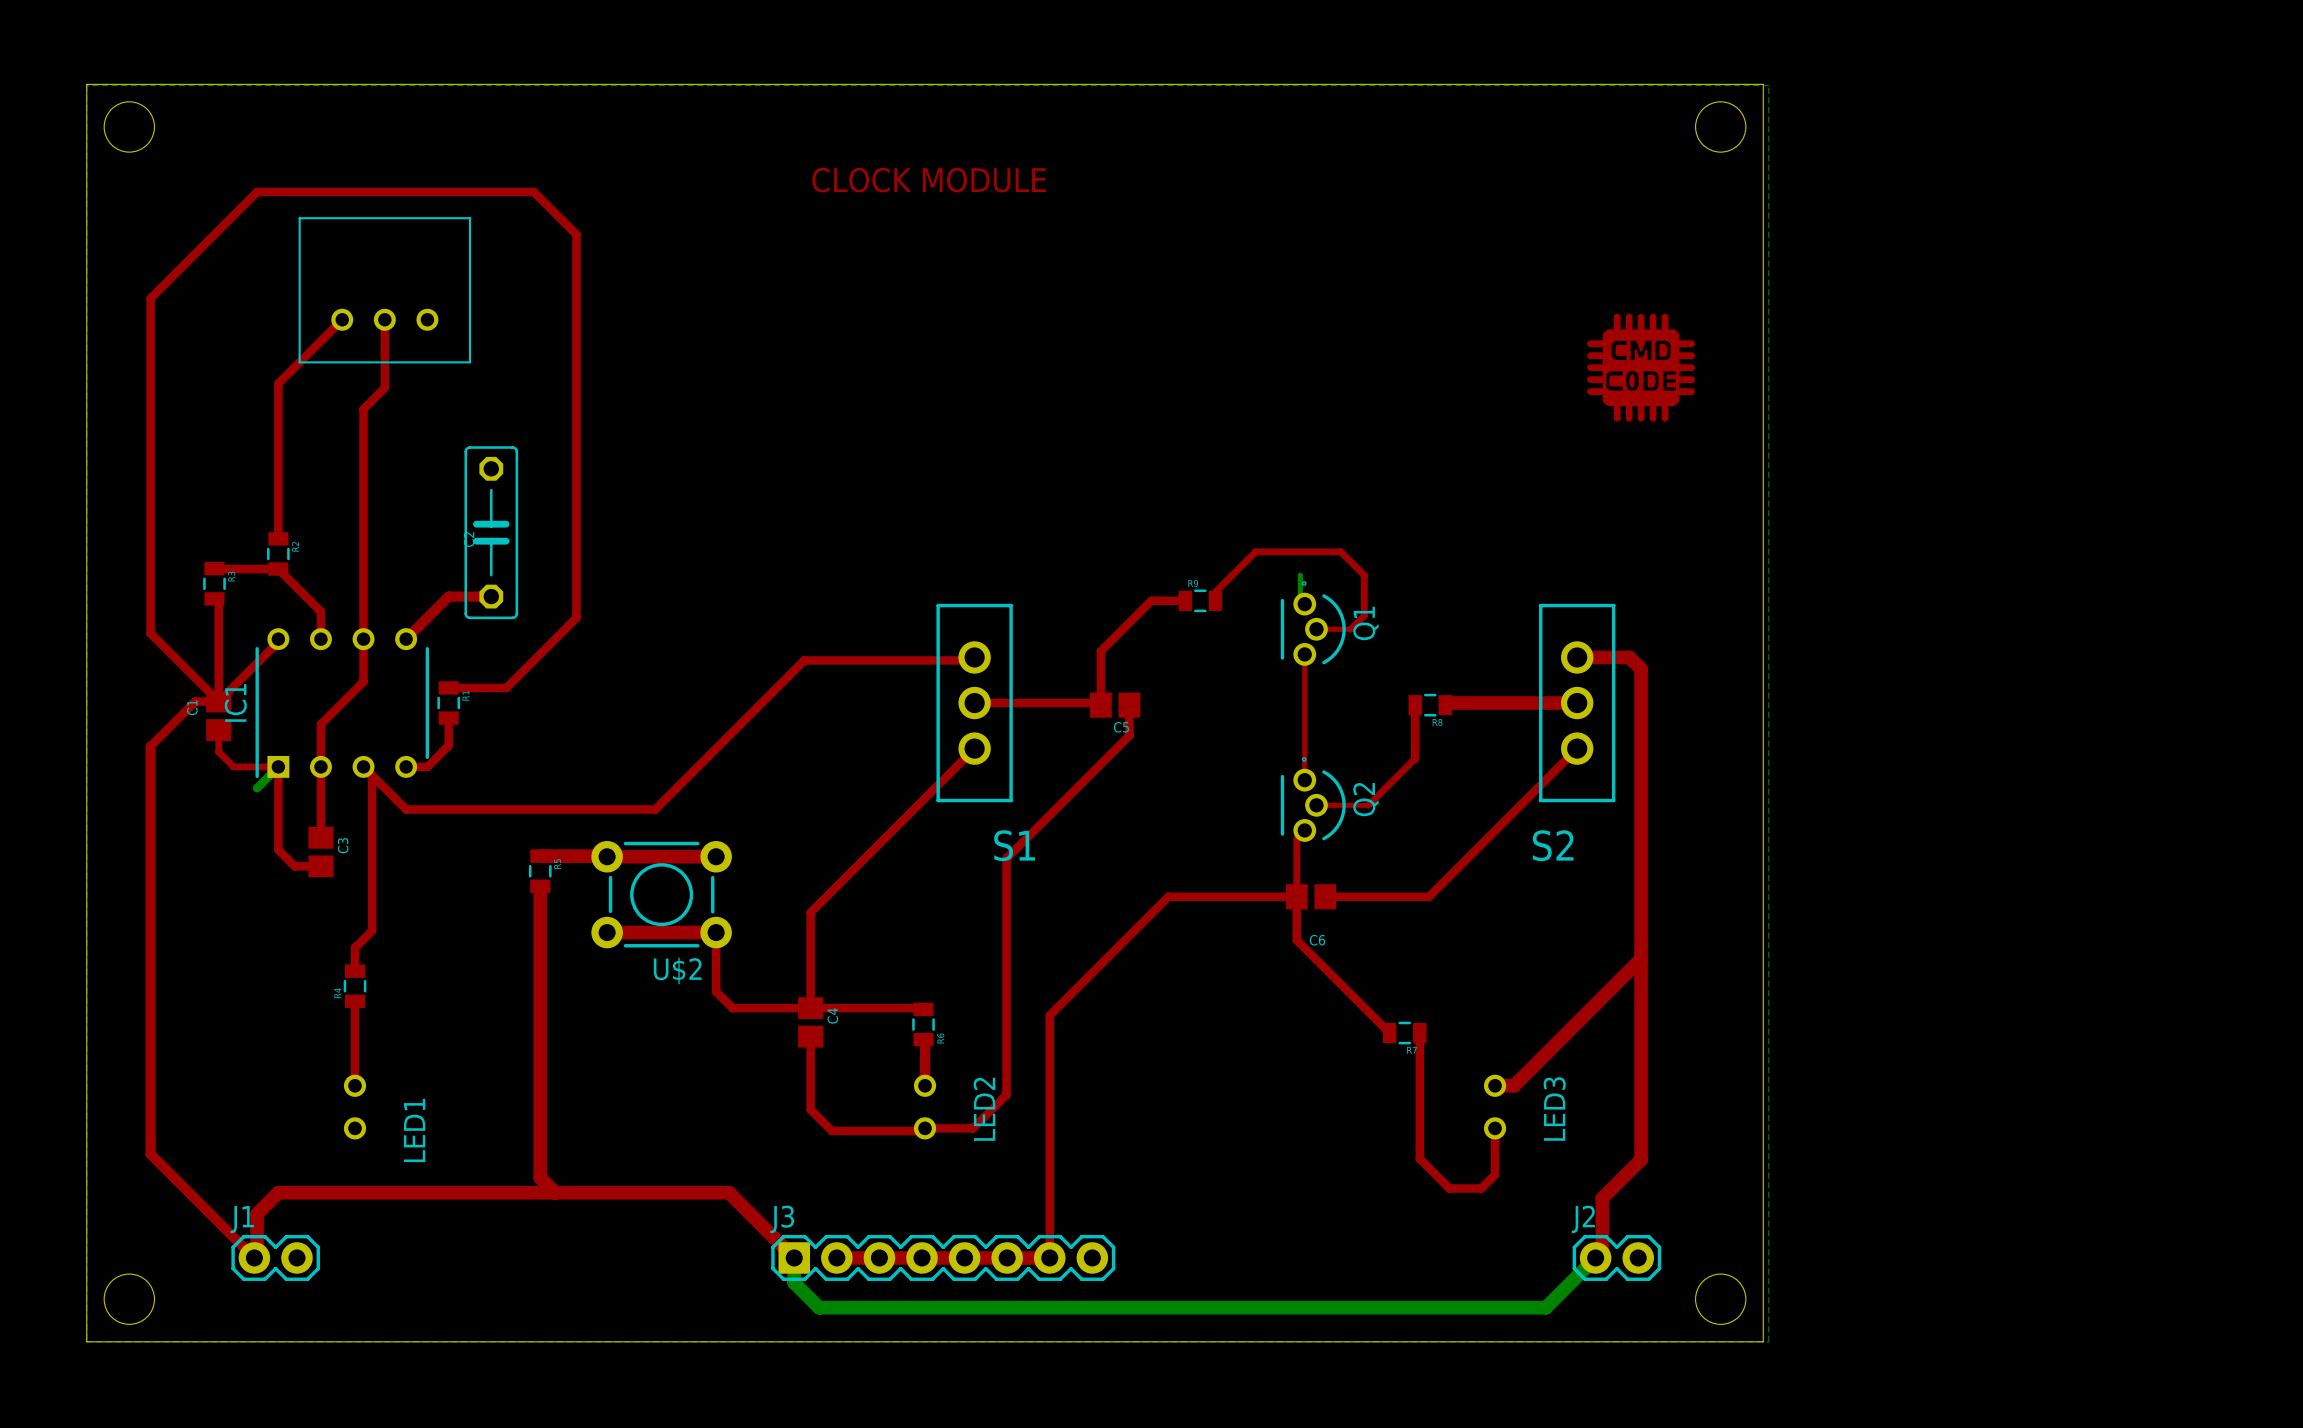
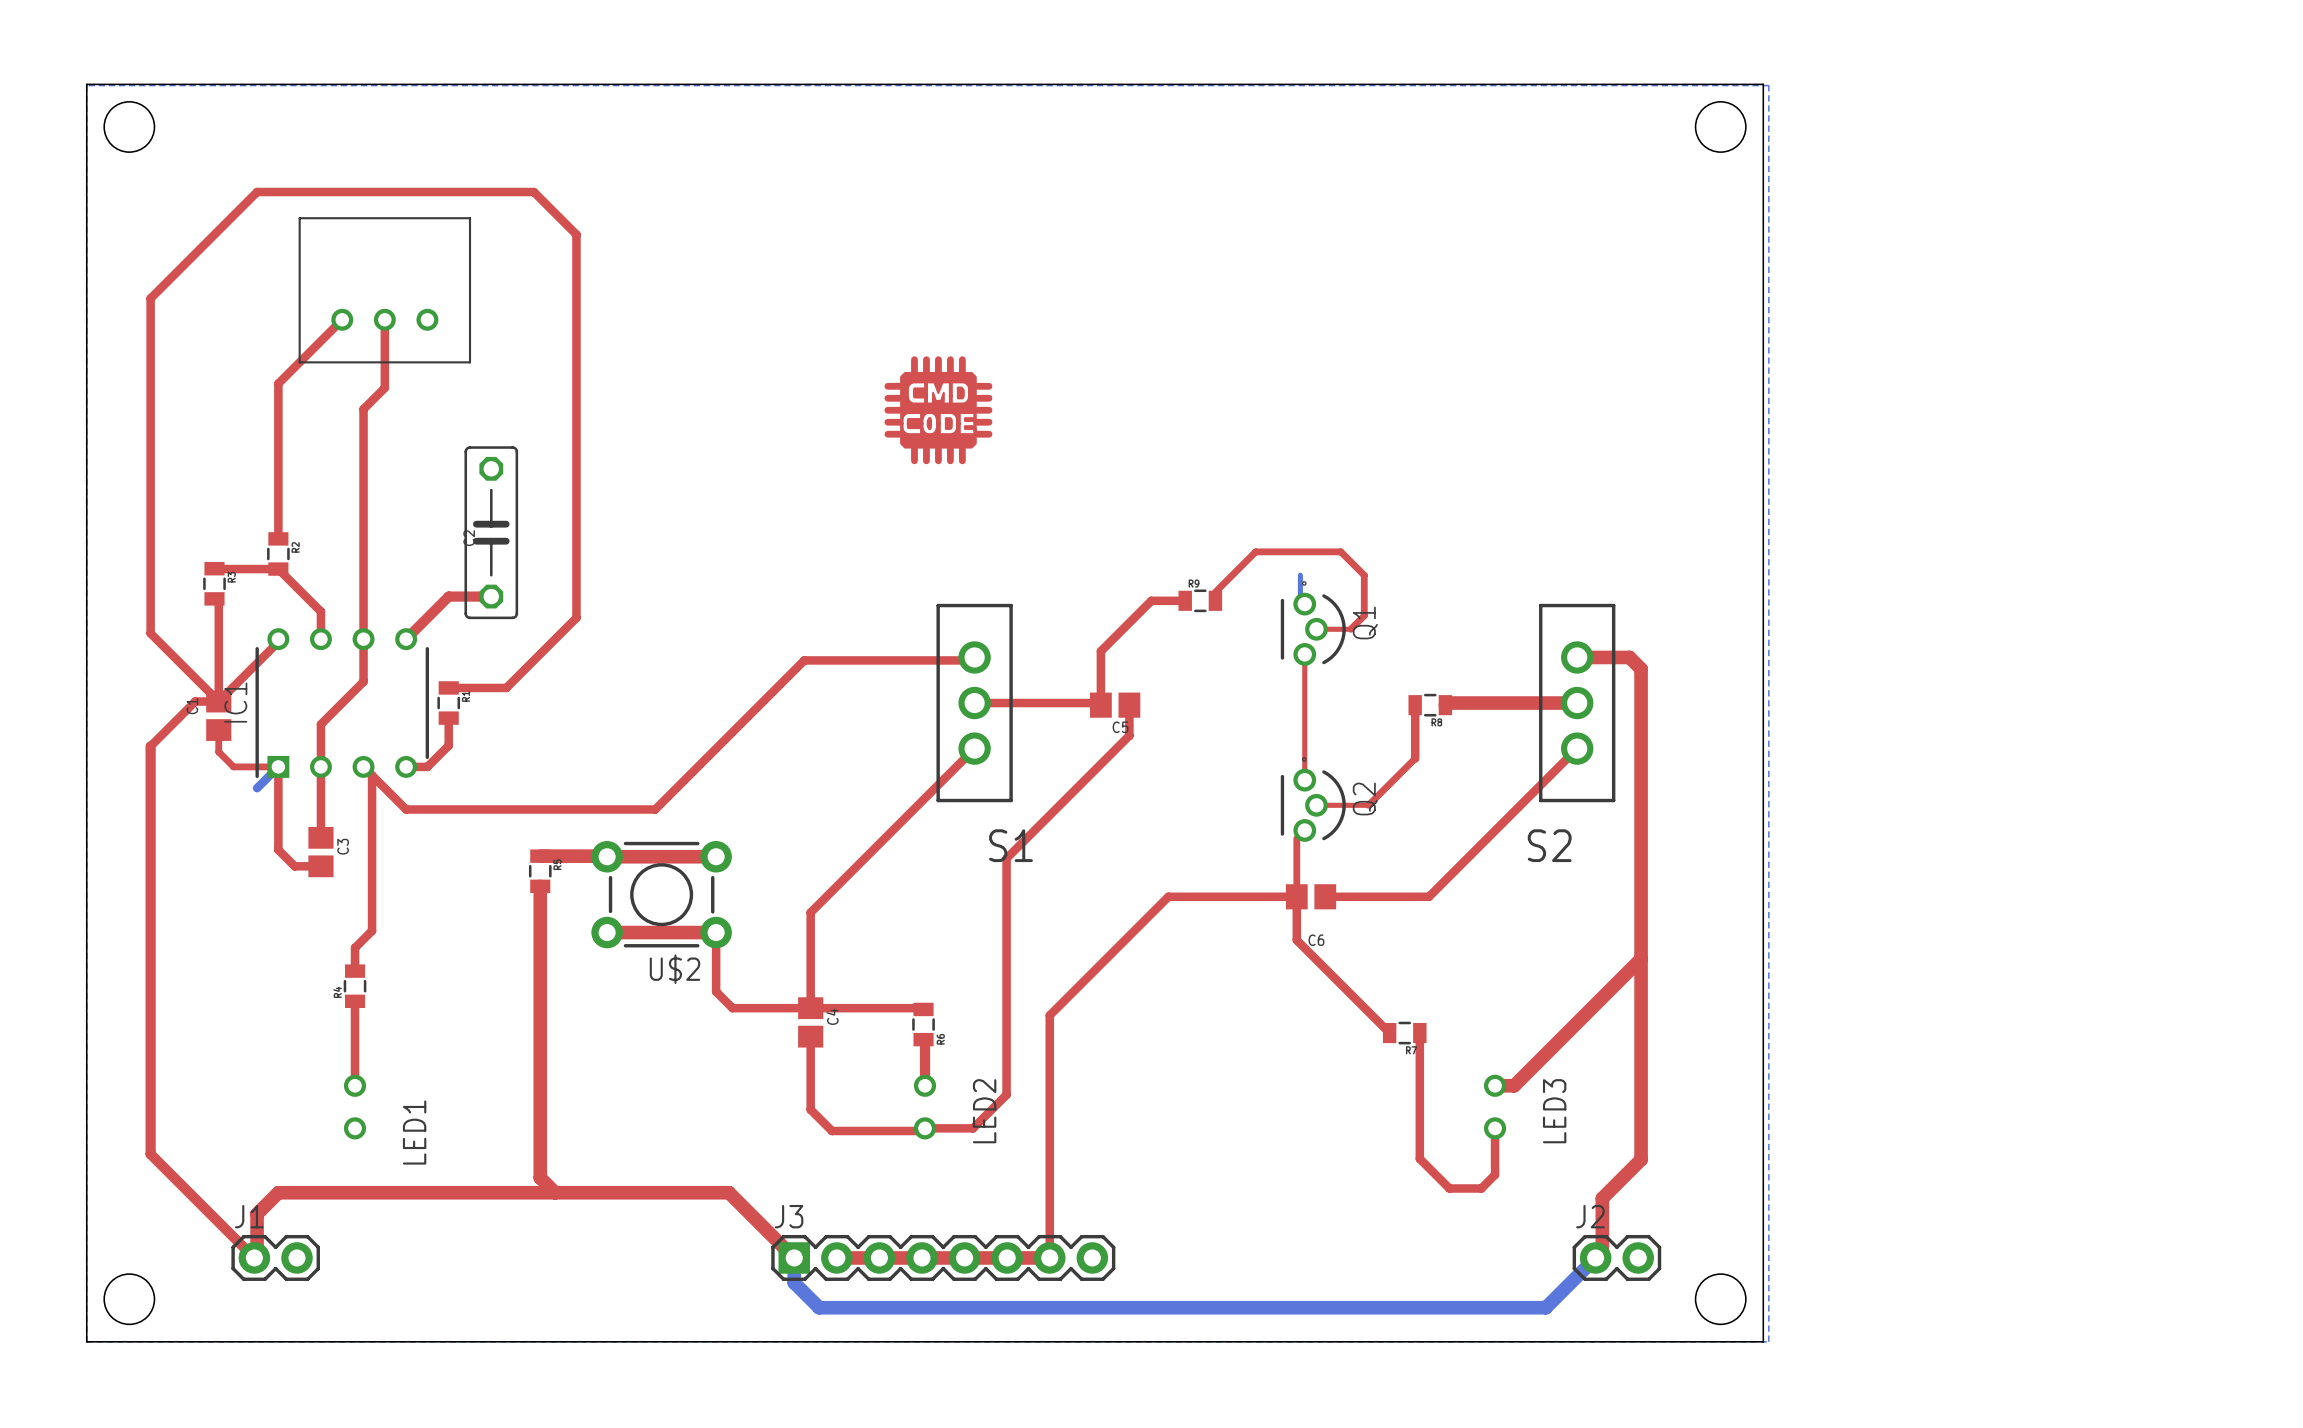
text: CLOCK MODULE (929, 180) -> none
drawing: [1587, 313, 1696, 422] -> none
drawing: none -> [884, 356, 993, 465]

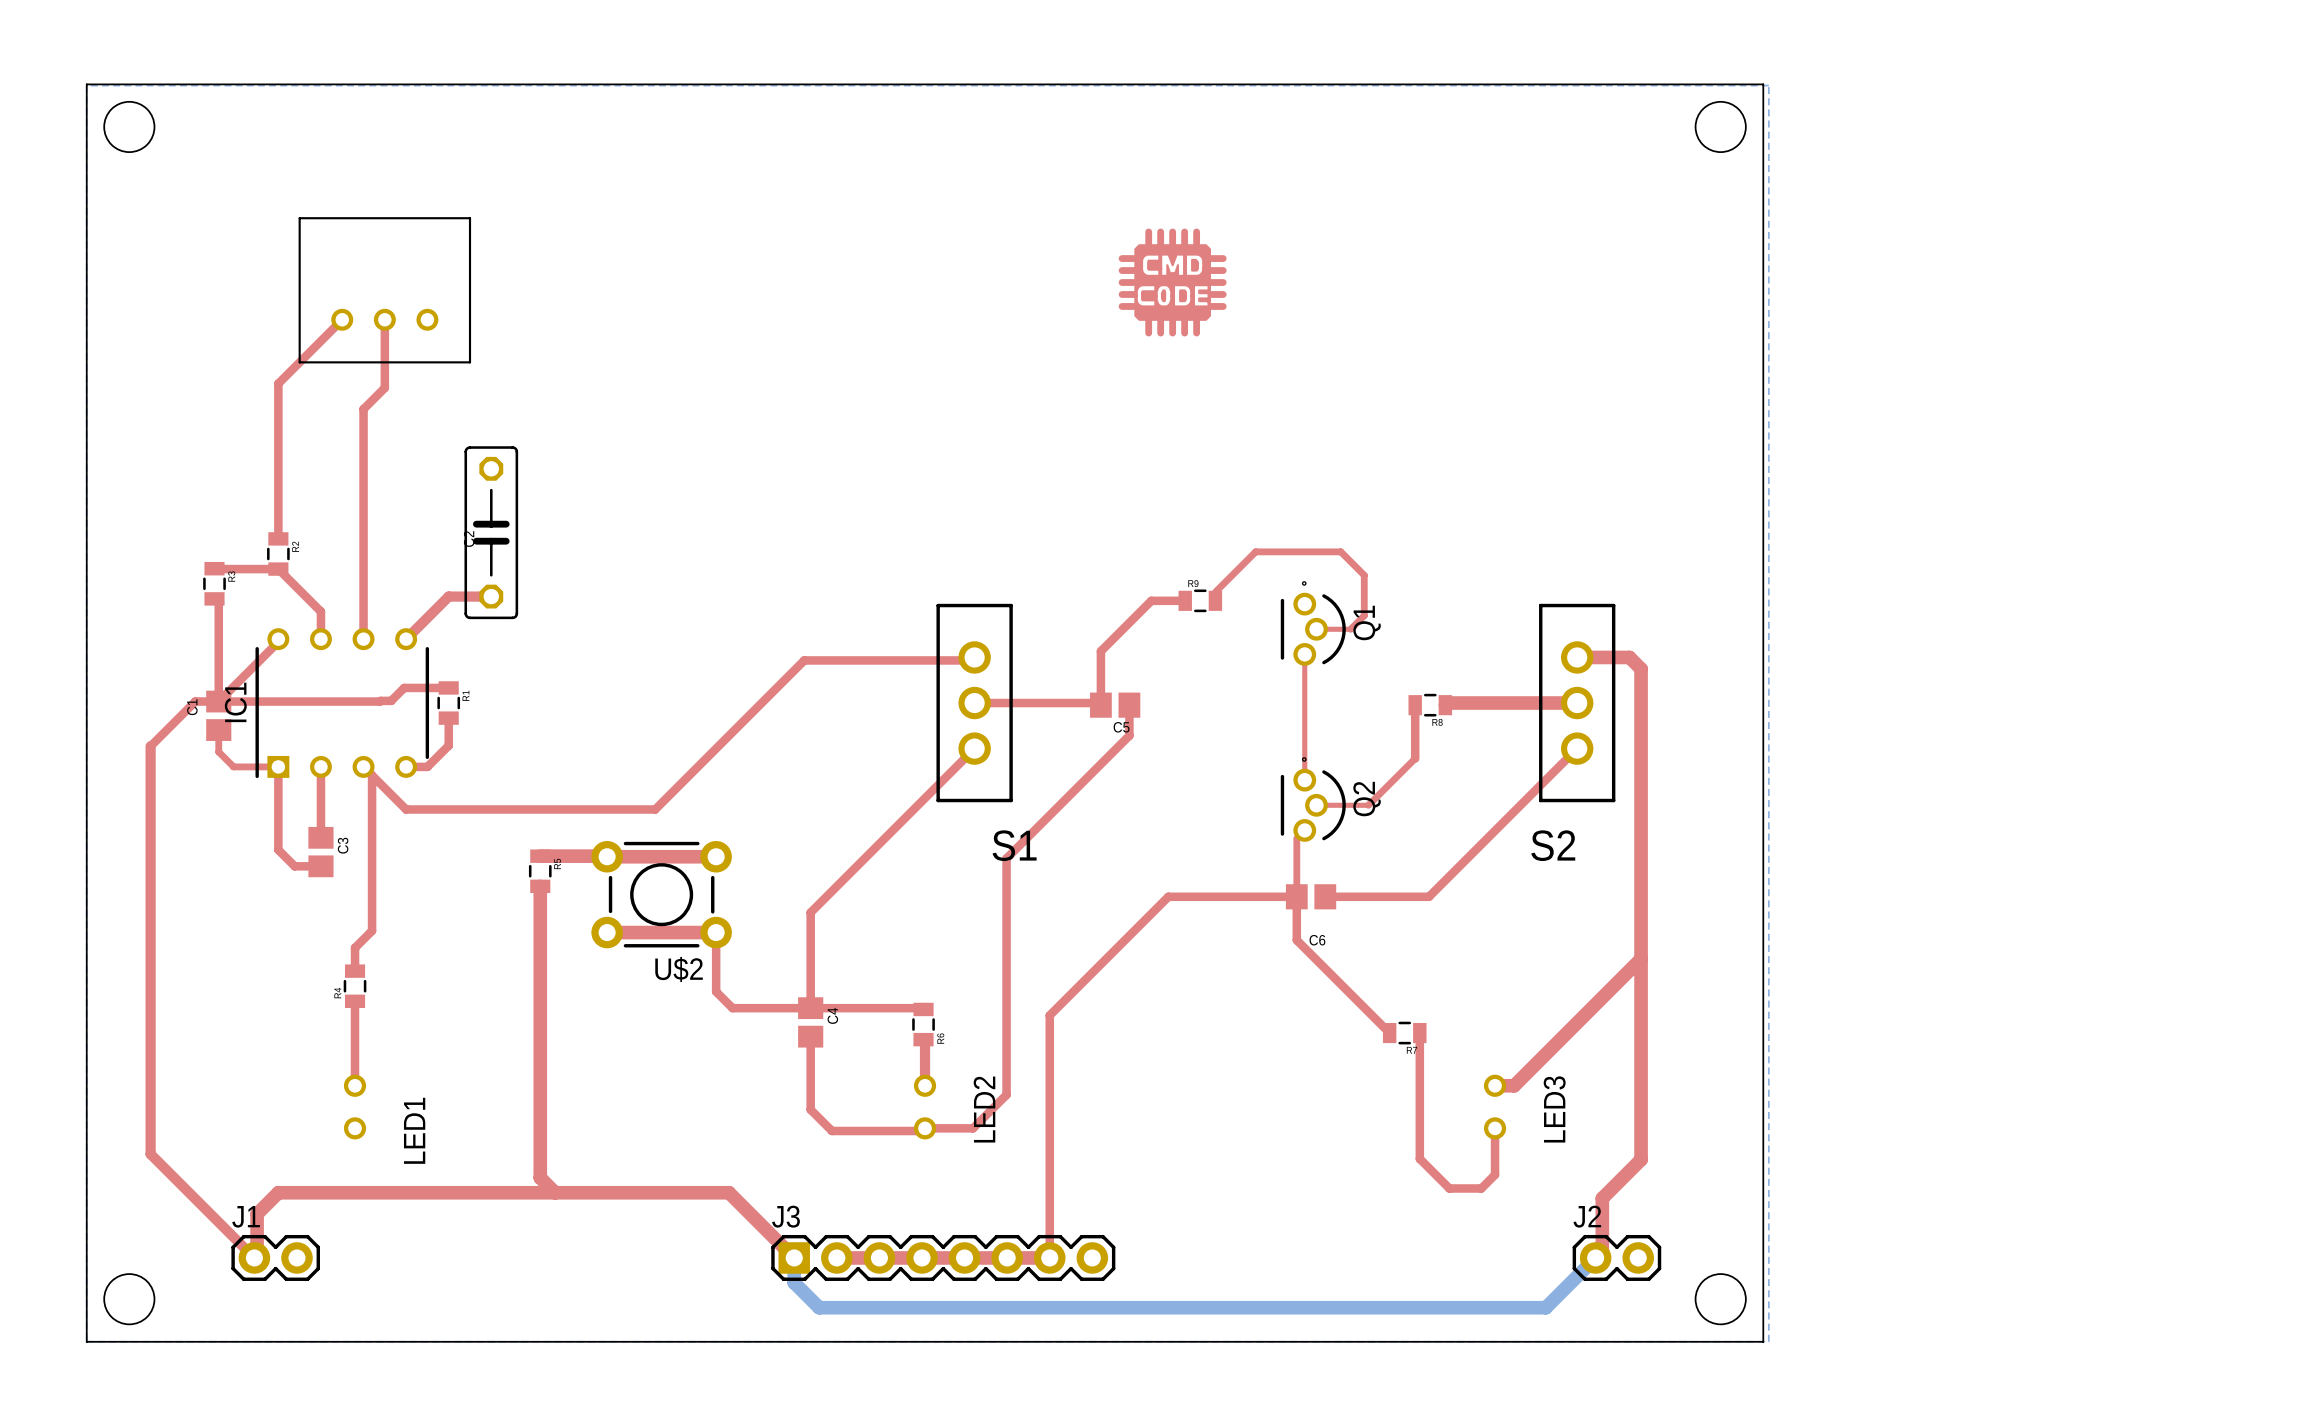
drawing position: (938, 410) -> (1172, 282)
bottom track: (1300, 575) (1300, 599) (1304, 604) -> none
top track: (363, 639) (363, 681) (320, 724) (320, 766) -> none
top track: (448, 687) (506, 687) (576, 617) (576, 234) (533, 192) (257, 192) (150, 298) (150, 633) (218, 701) -> (448, 687) (404, 687) (391, 700) (218, 701)
bottom track: (278, 766) (257, 788) -> none

